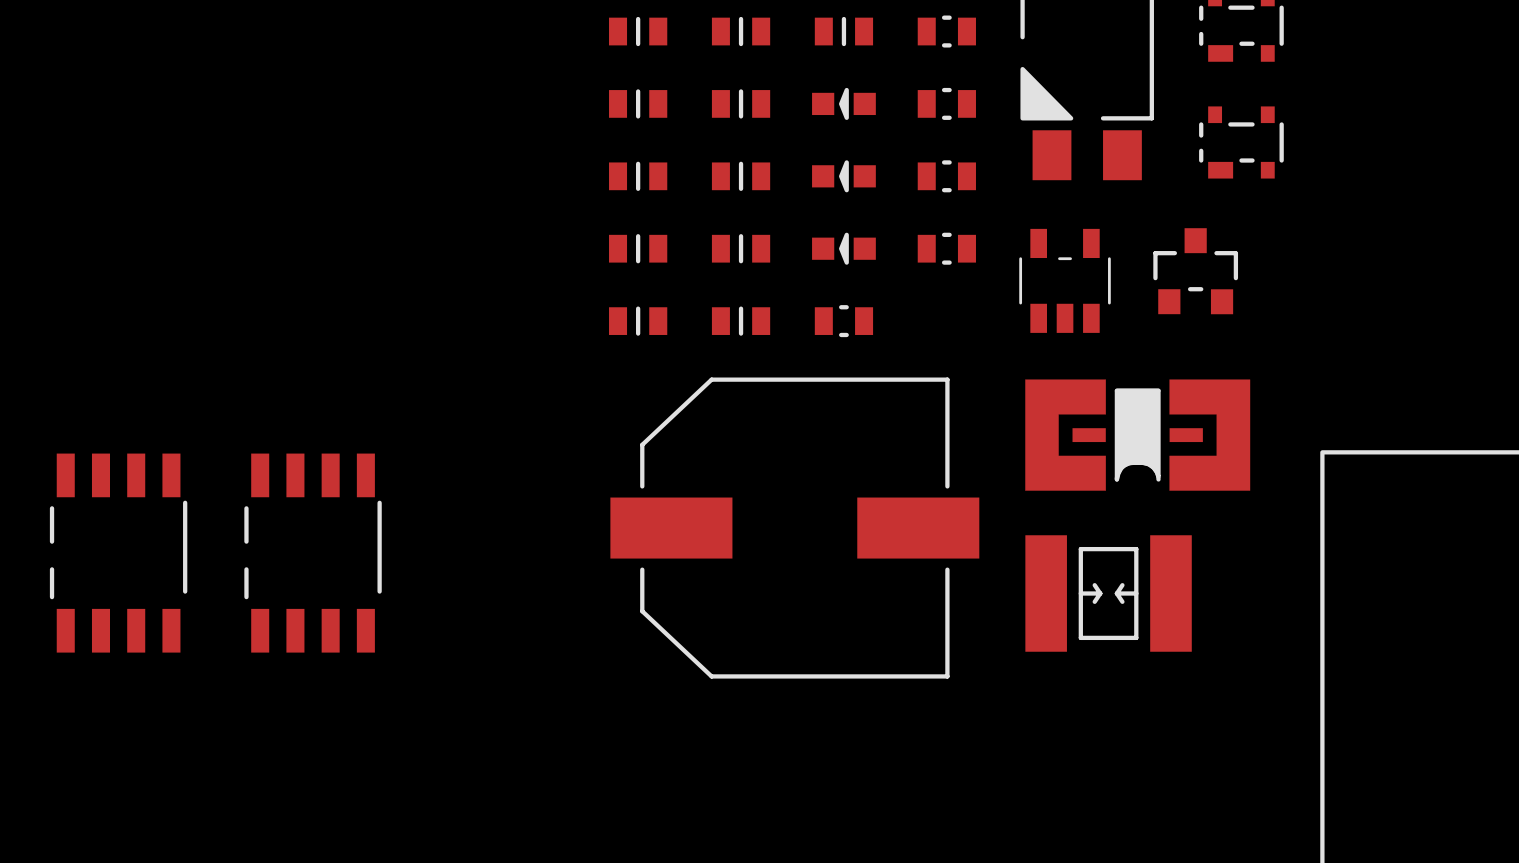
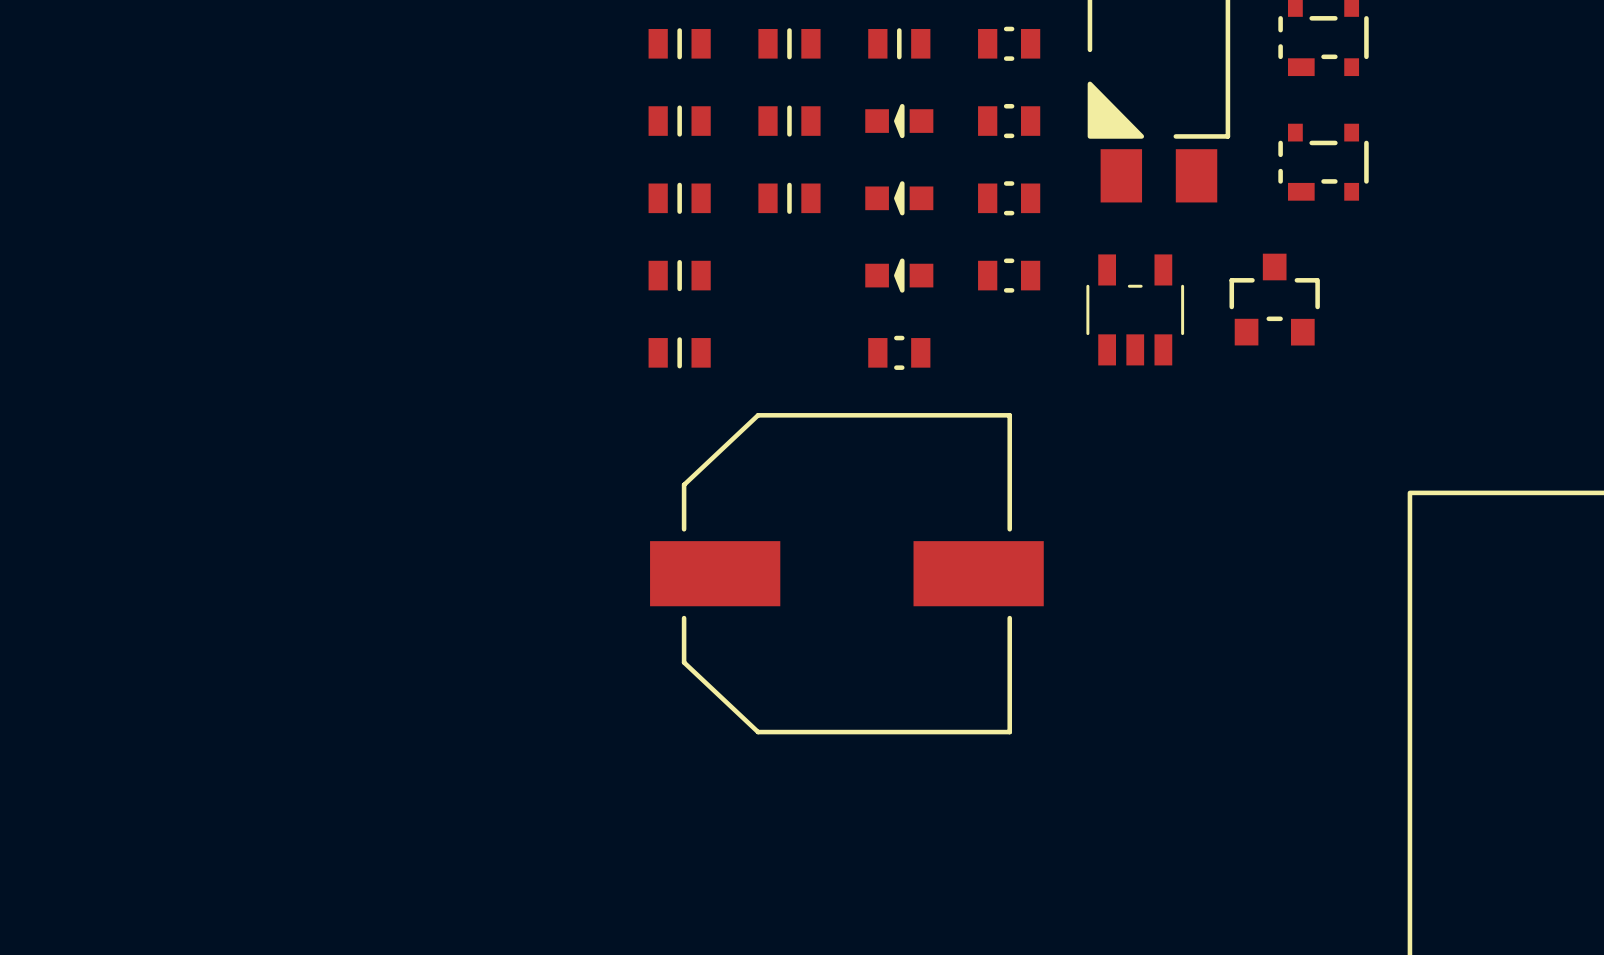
part: (741, 248) -> none
part: (741, 321) -> none
part: (1137, 435) -> none
part: (118, 553) -> none
part: (313, 553) -> none
part: (1108, 593) -> none

